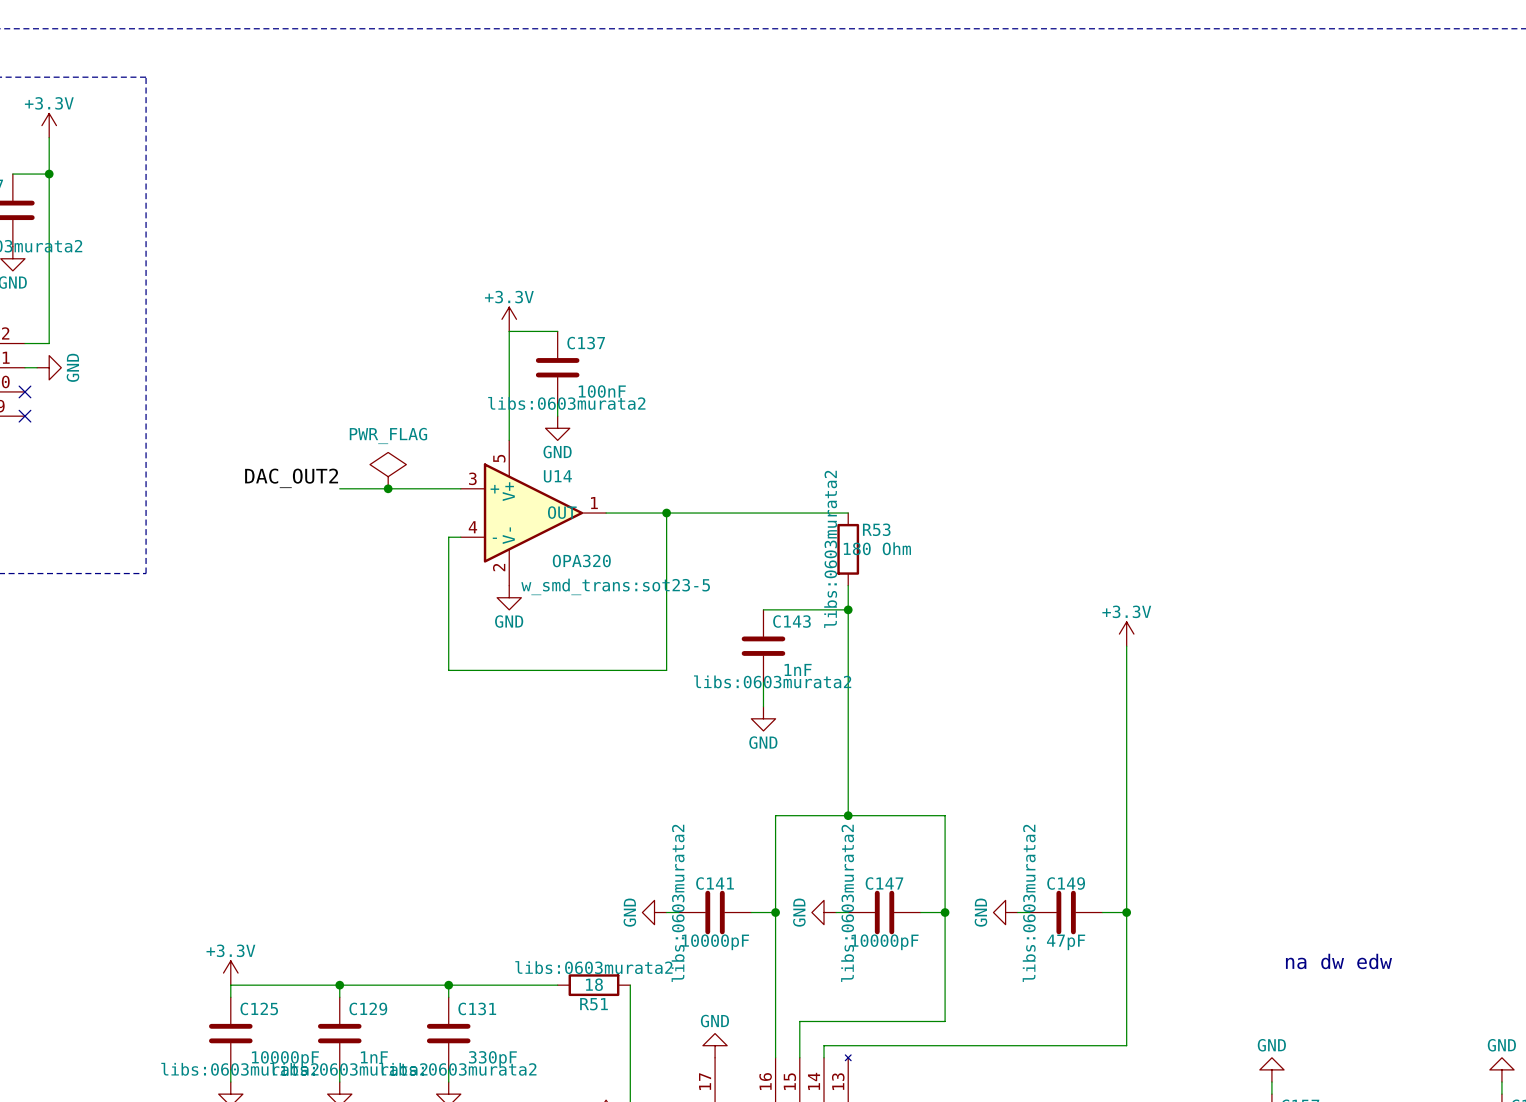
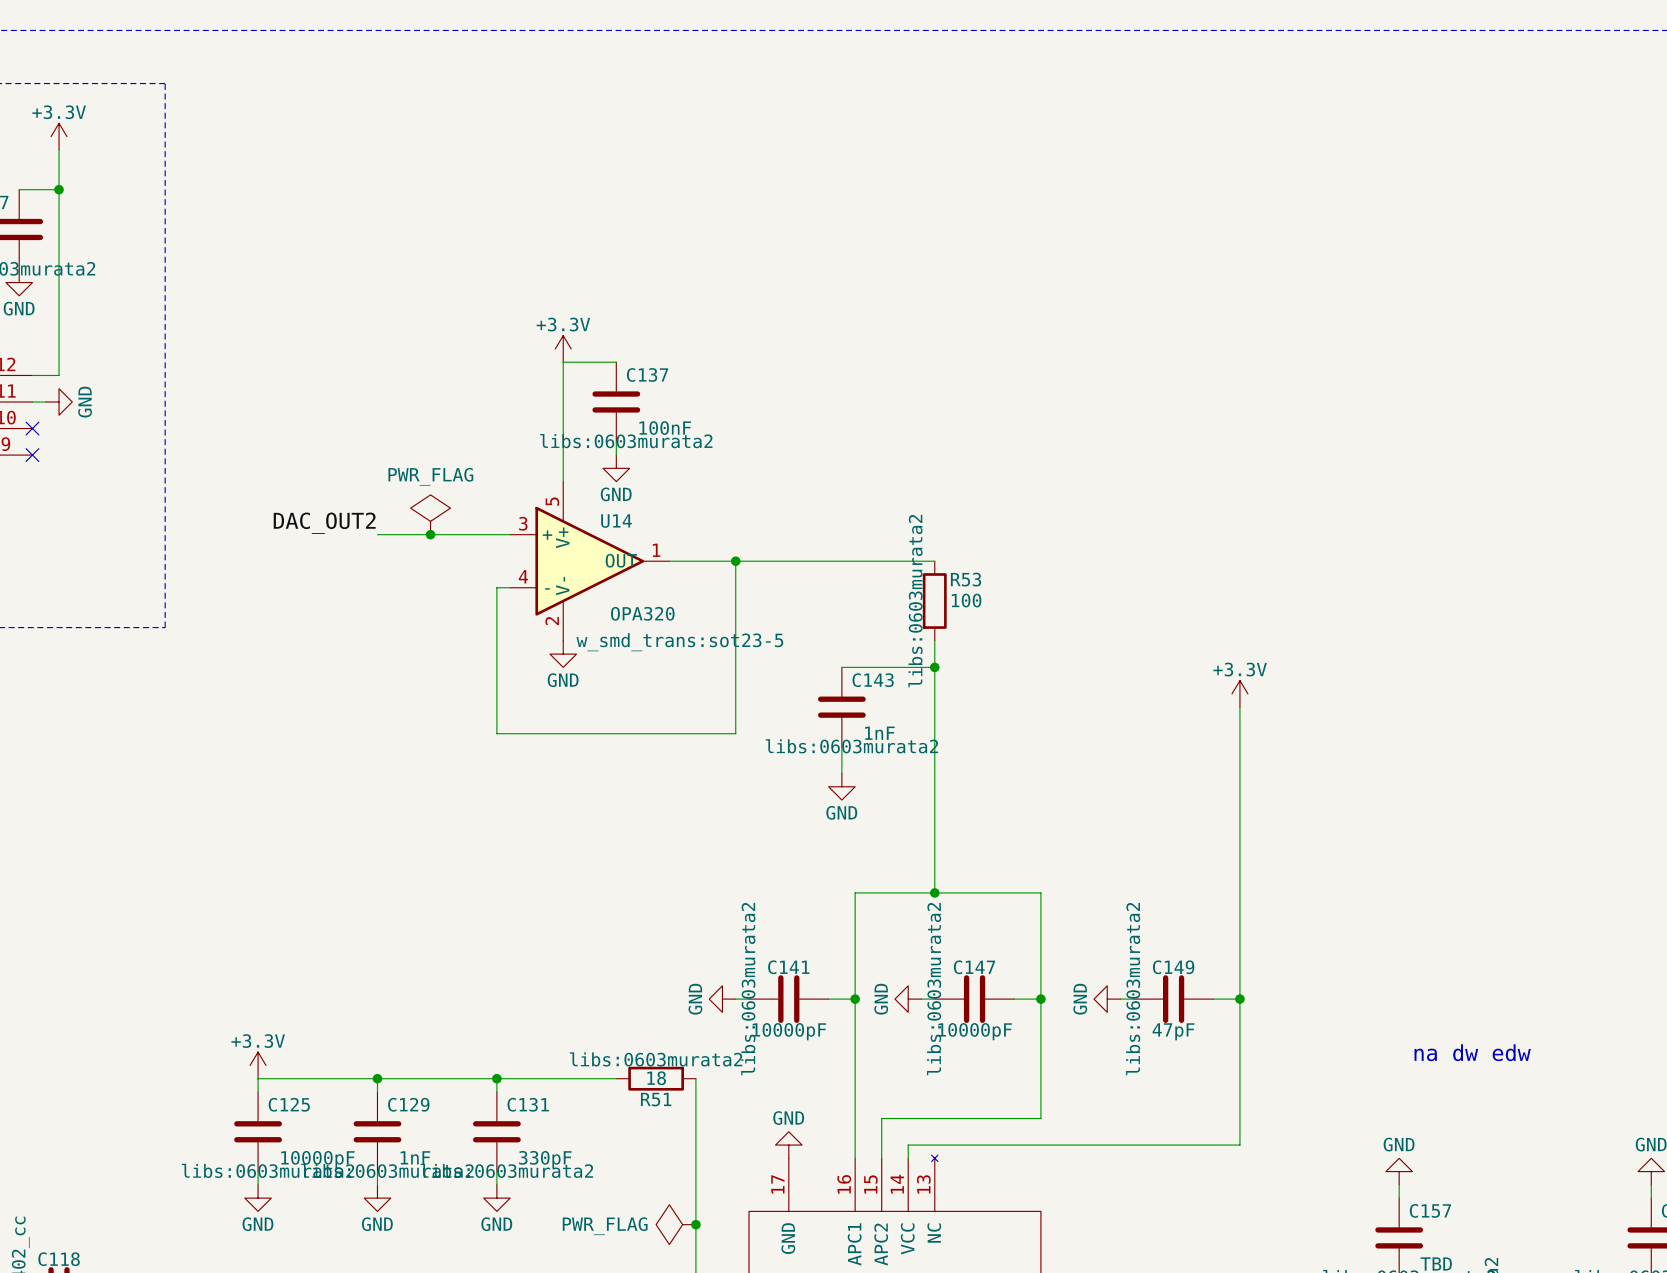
R53 value: 180 Ohm (877, 548) -> 100 (966, 600)

